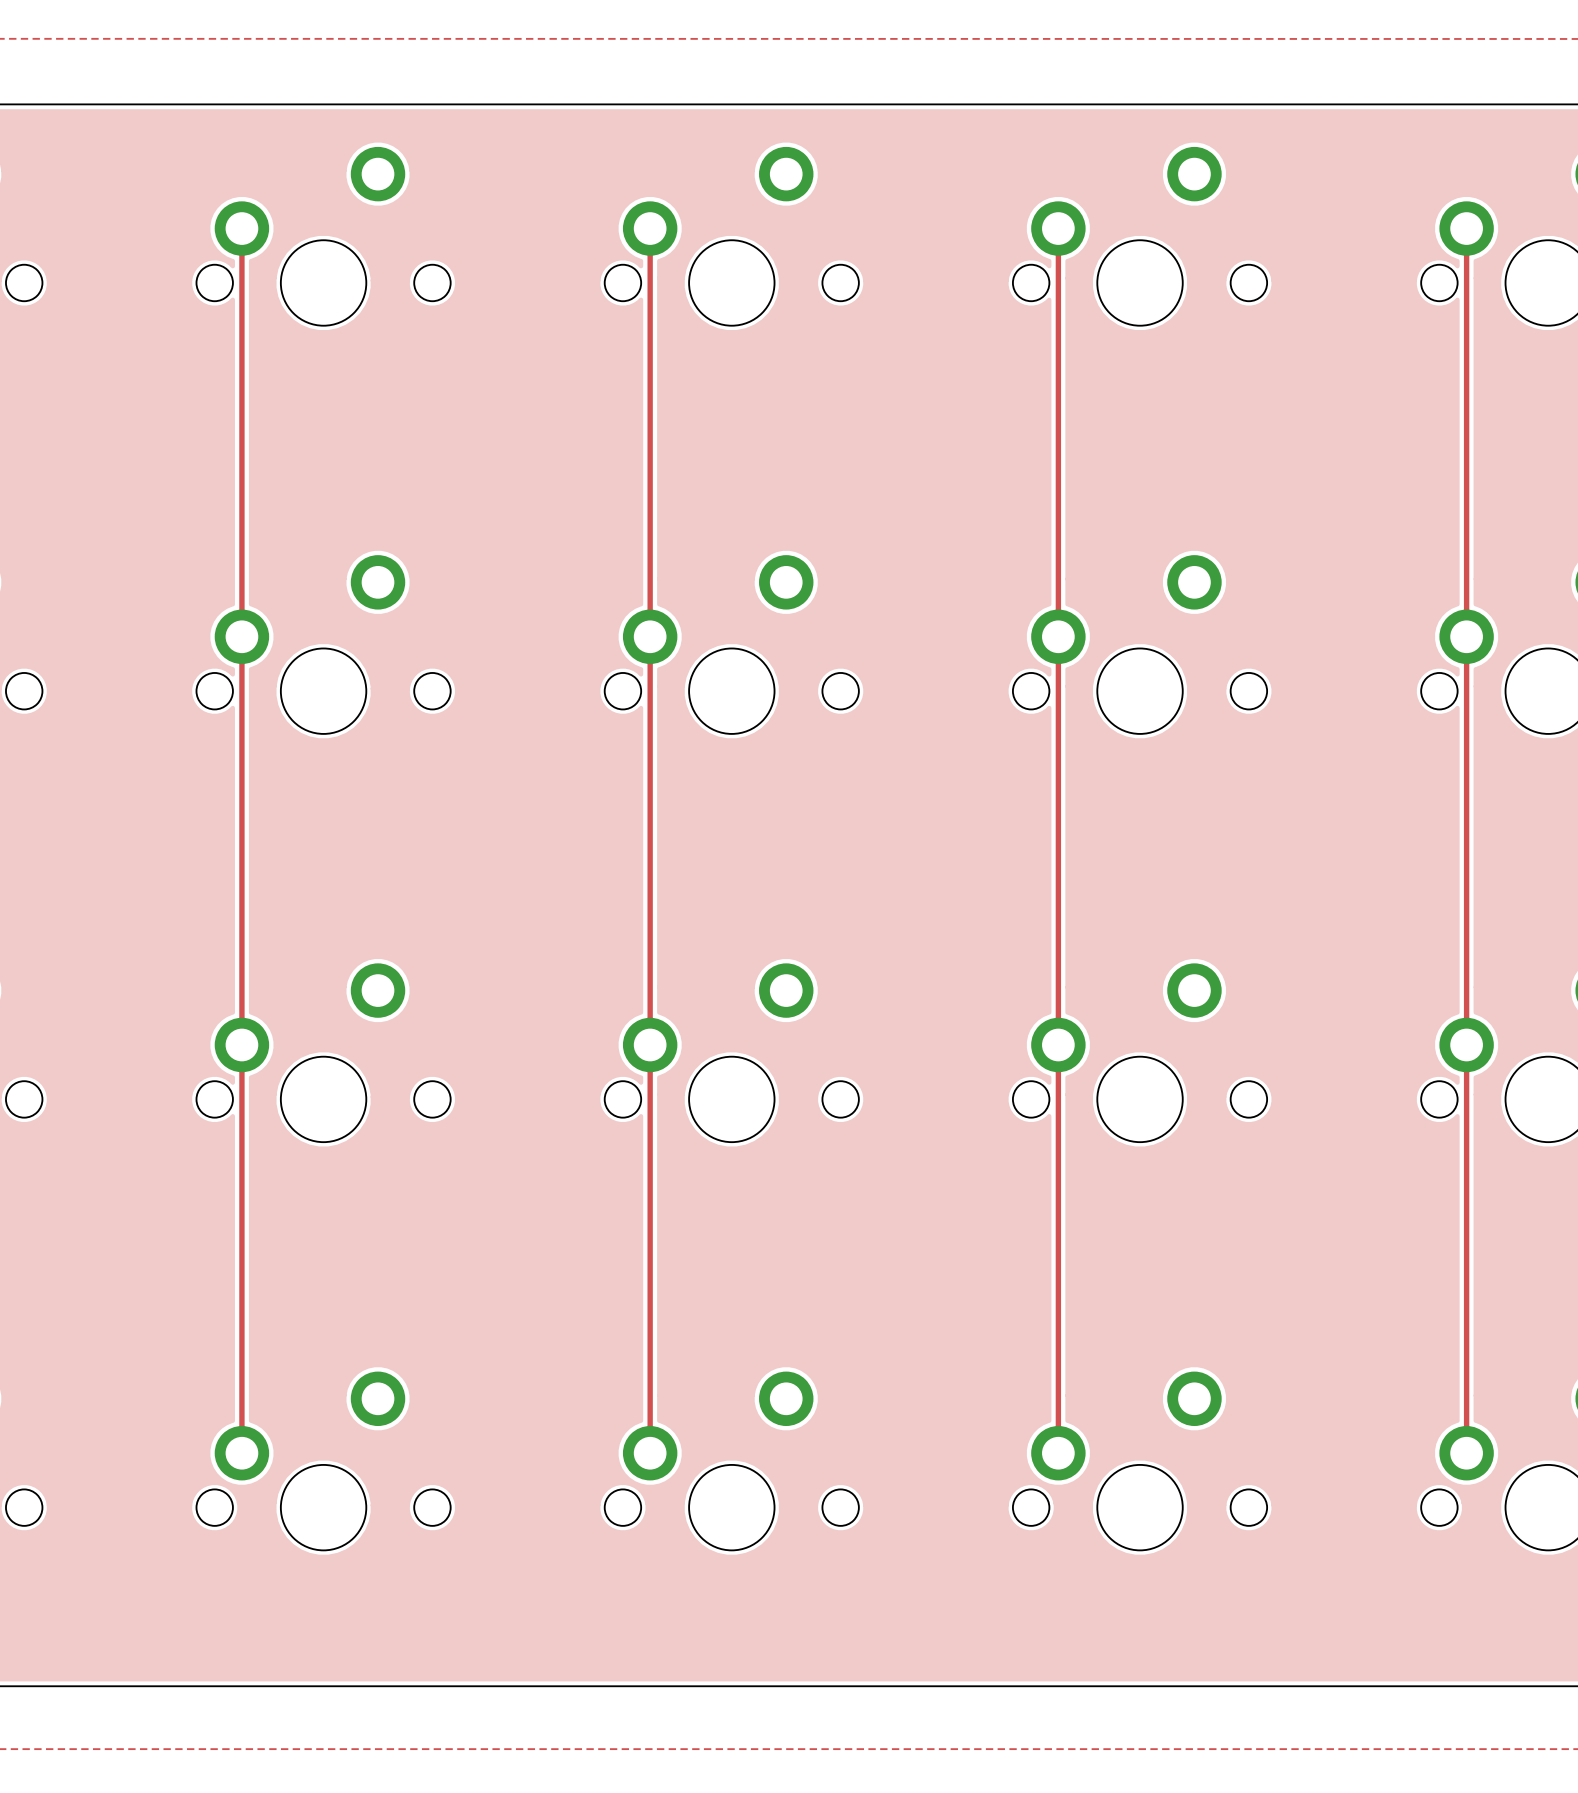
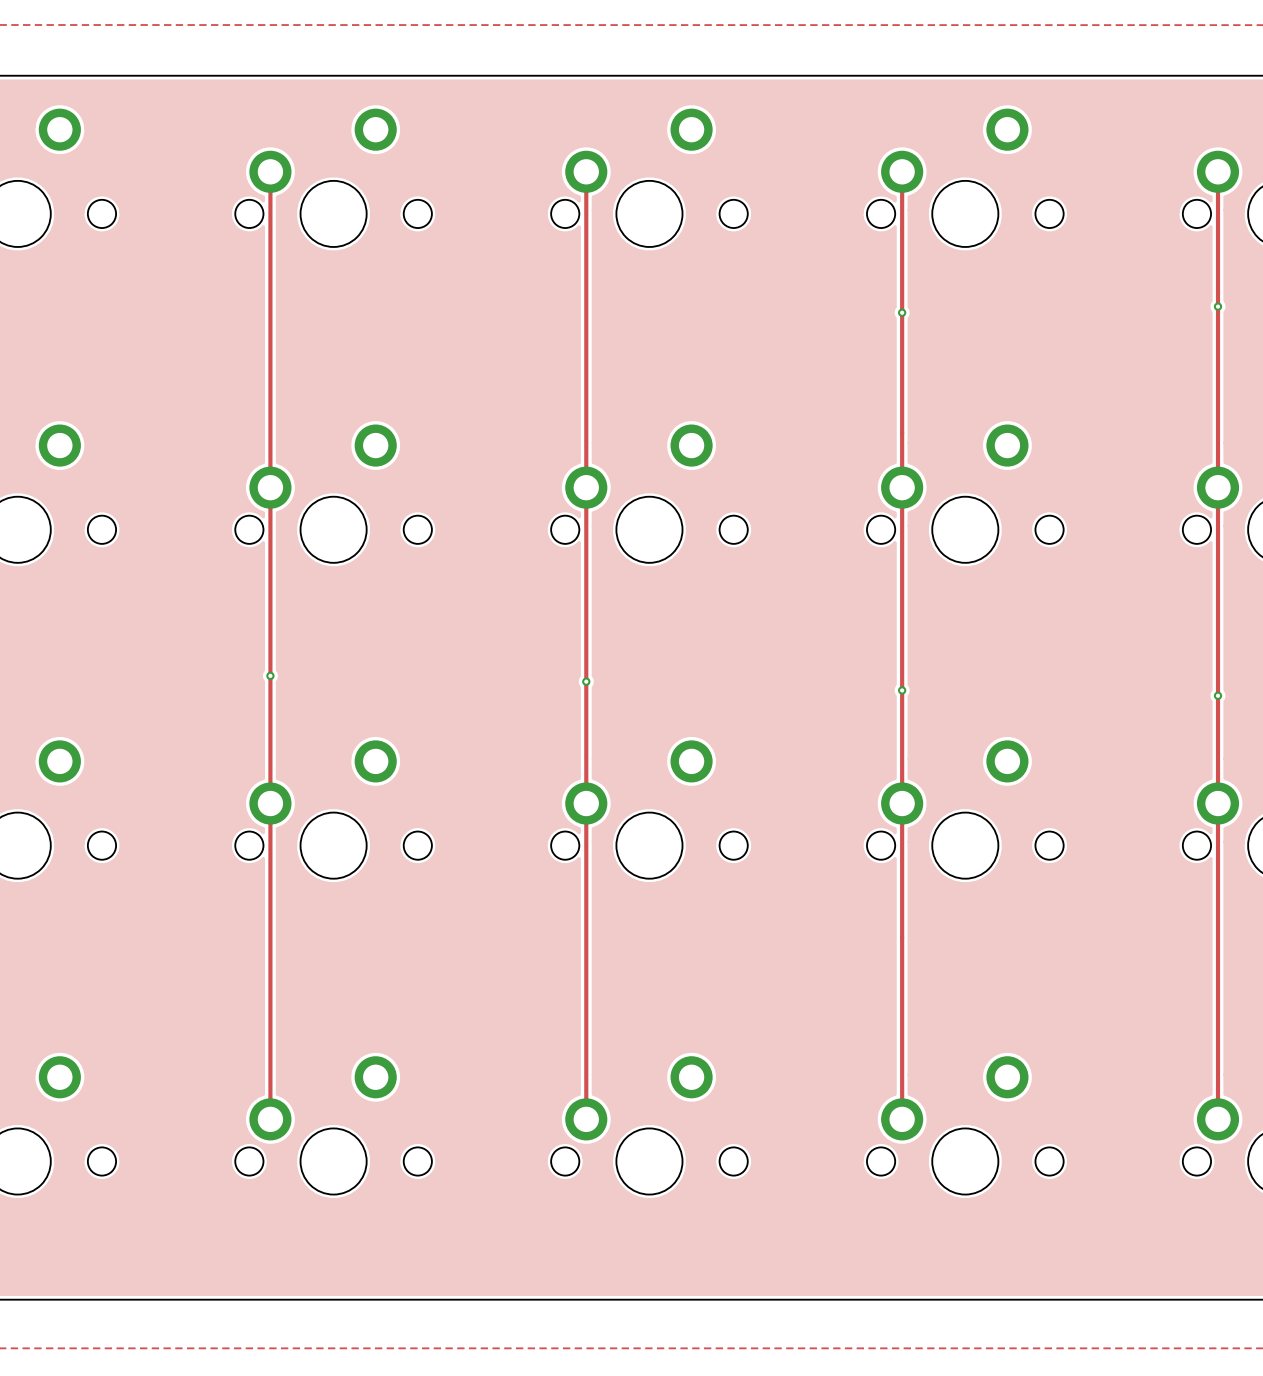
via: none -> (1218, 306)
via: none -> (902, 312)
via: none -> (270, 675)
via: none -> (586, 681)
via: none -> (902, 690)
via: none -> (1218, 695)

